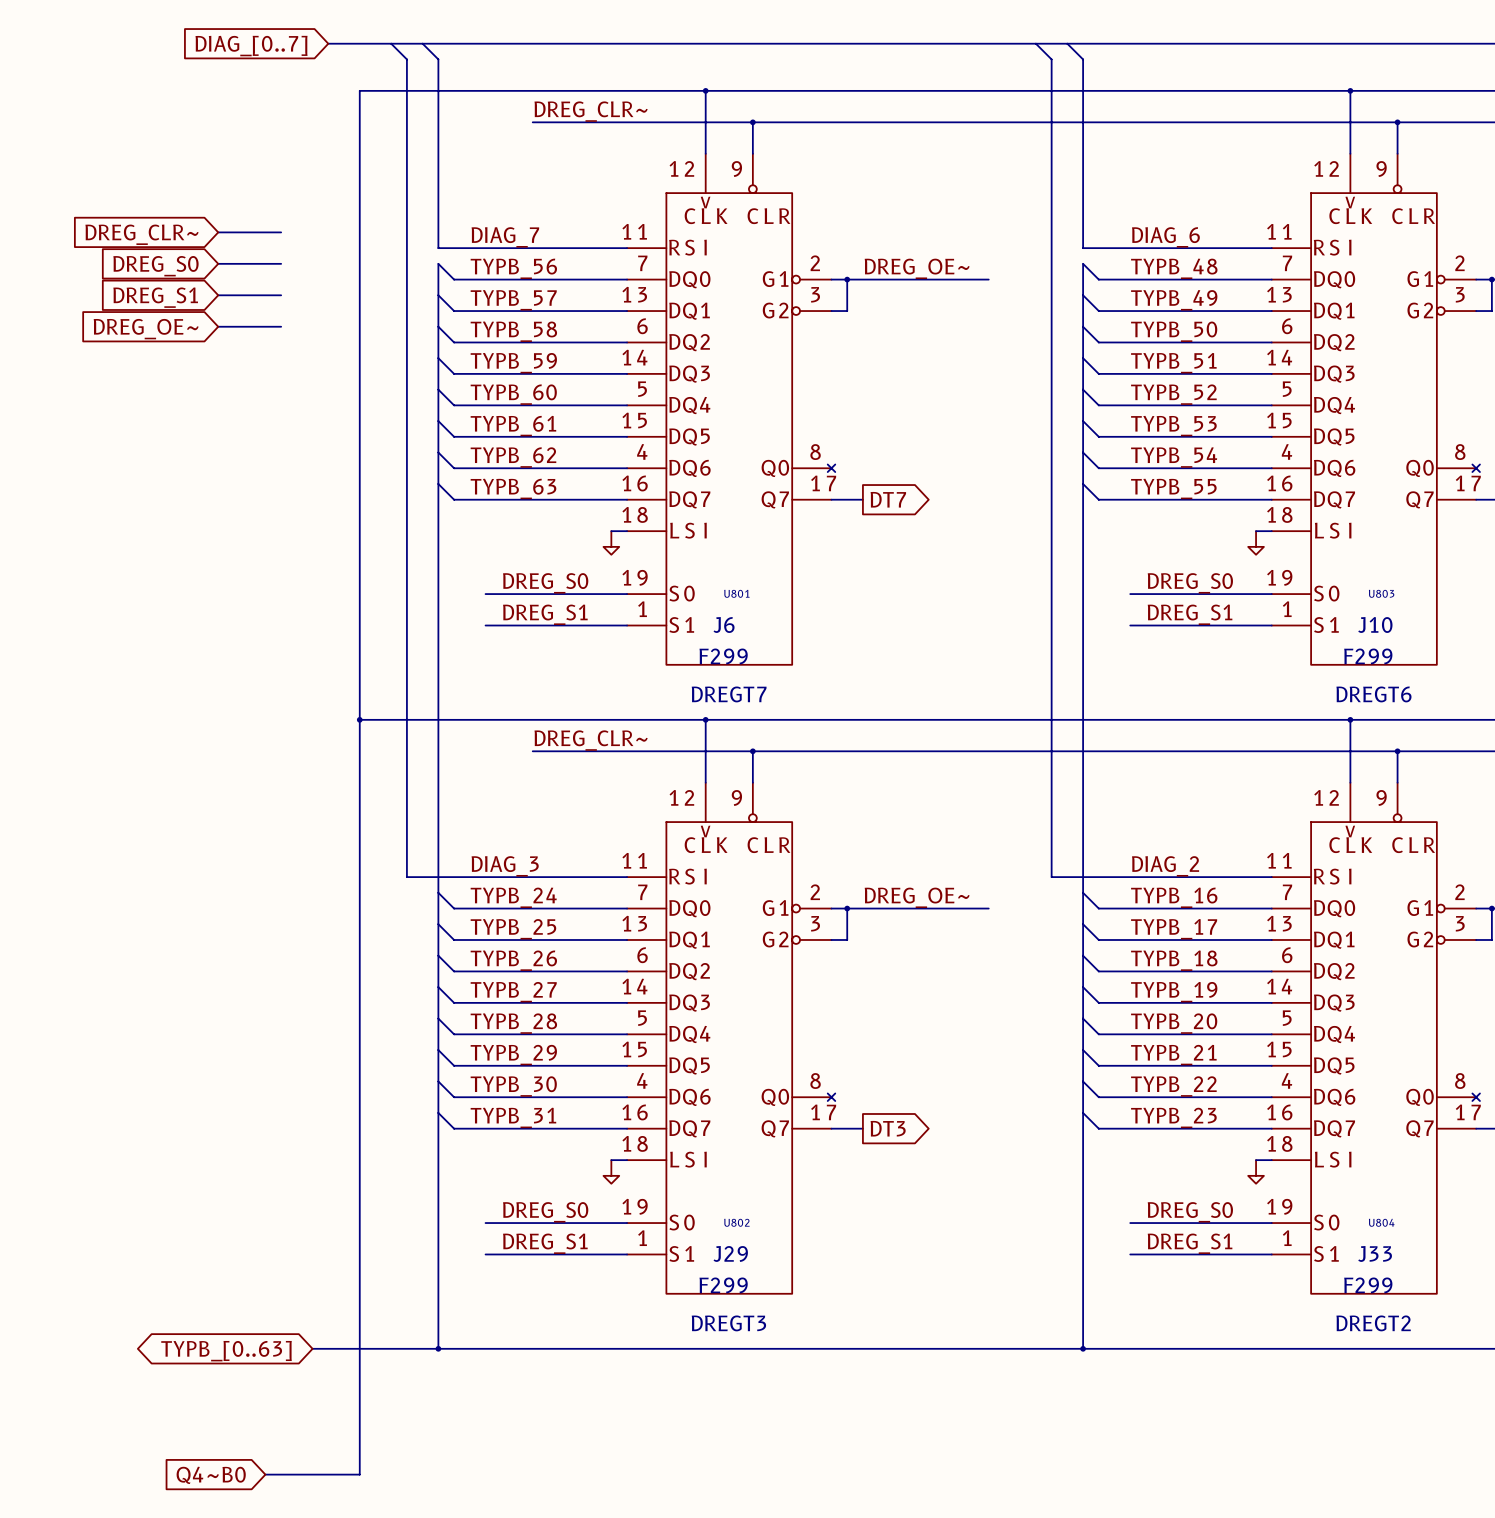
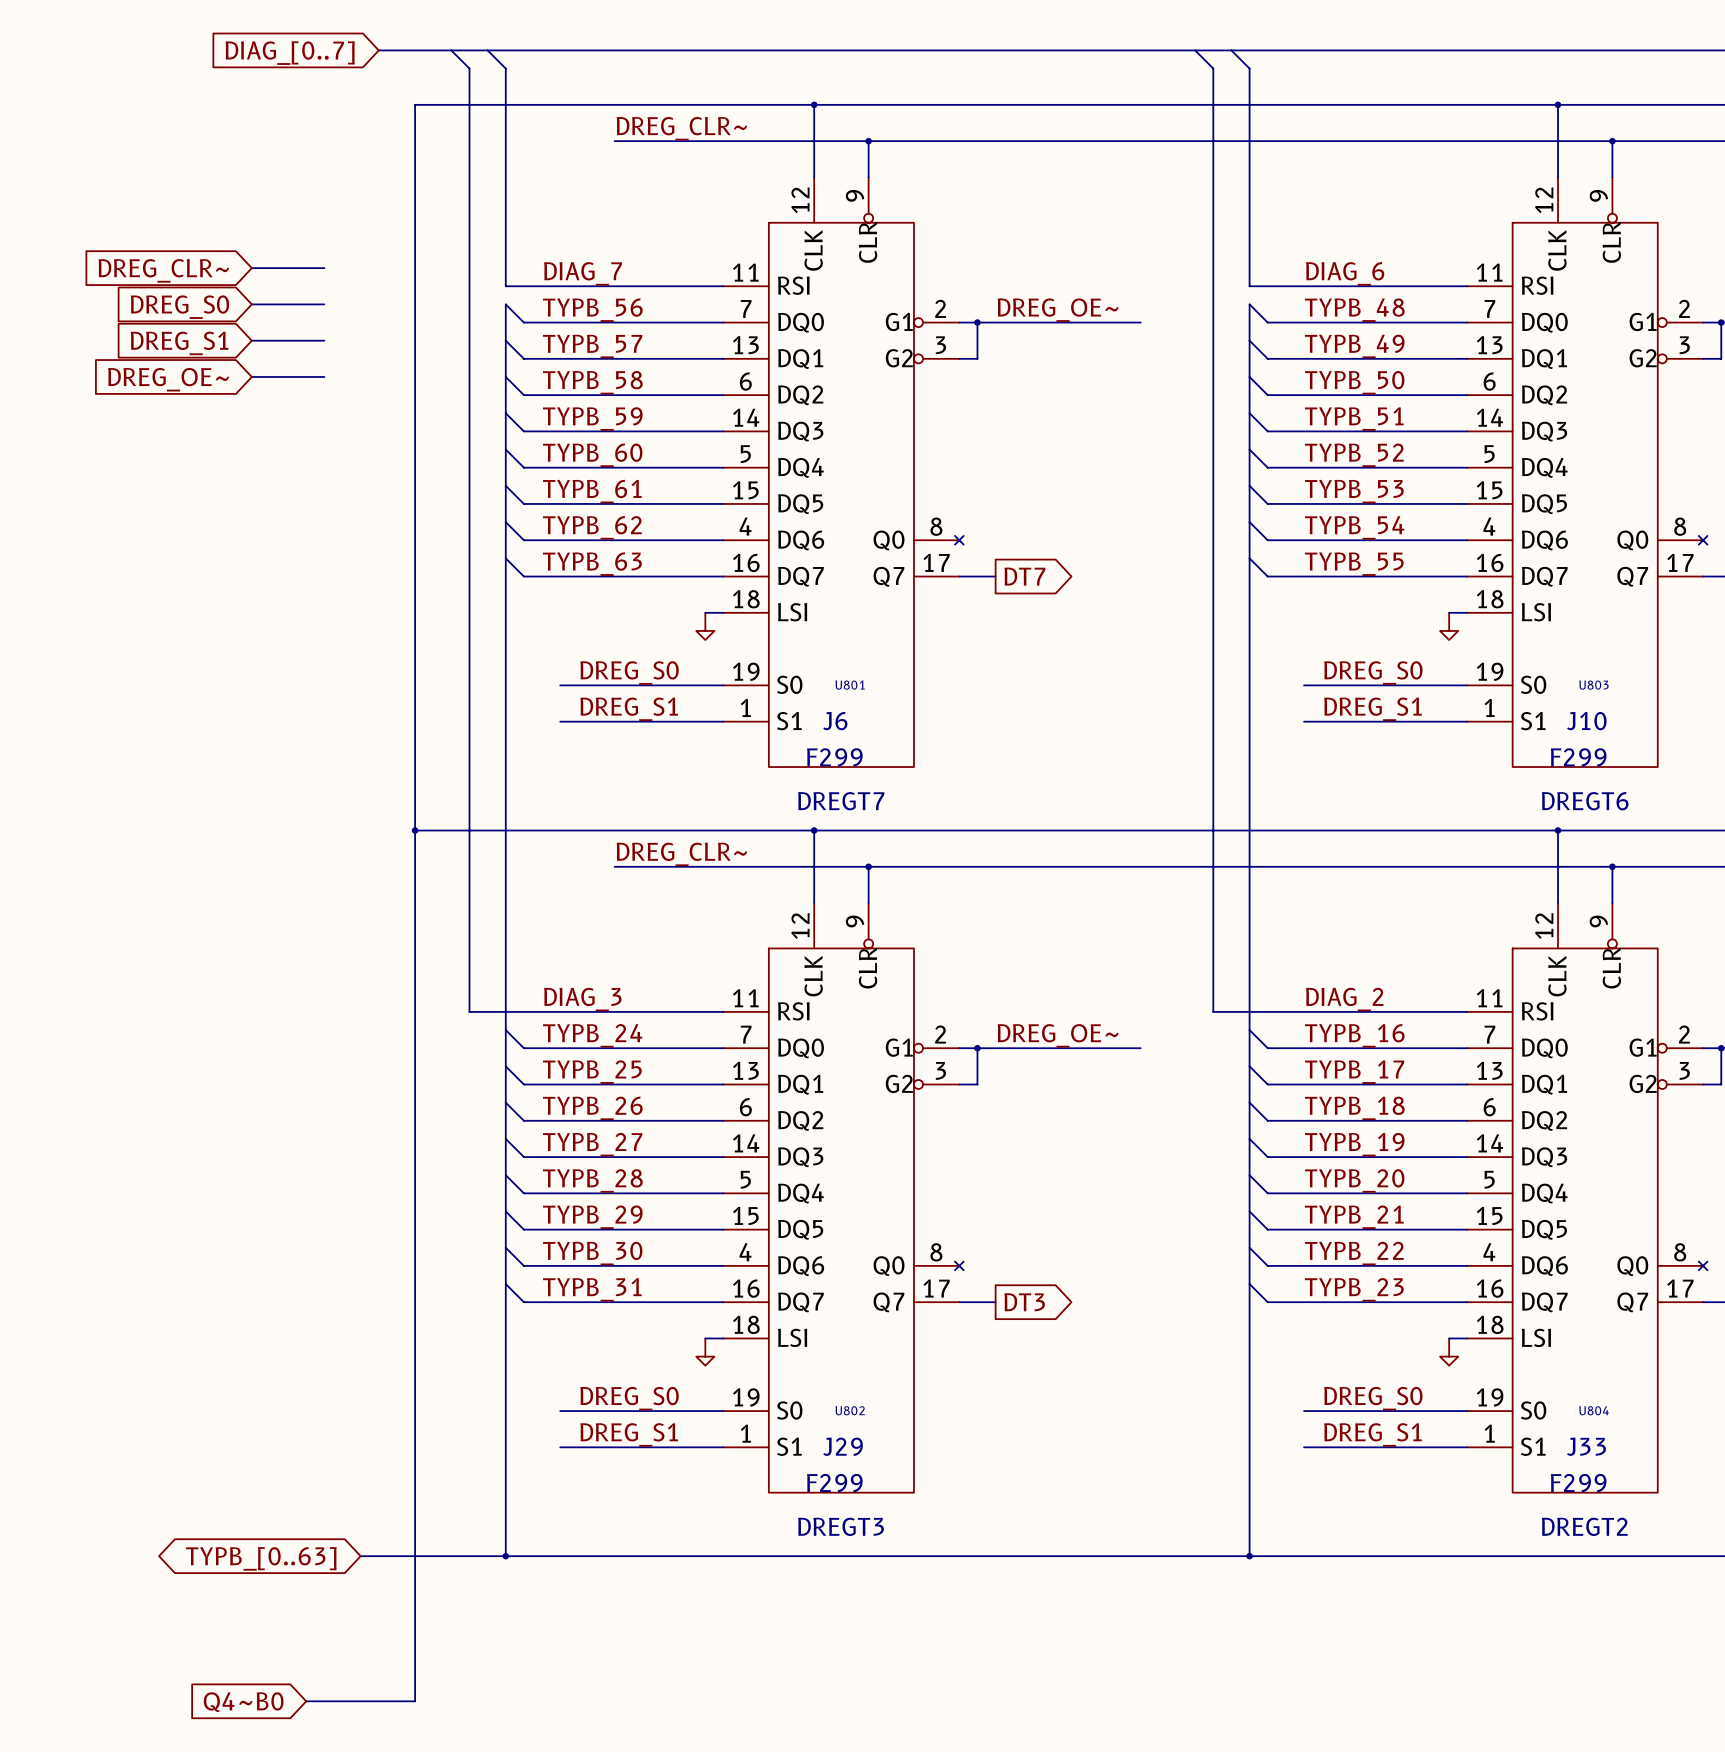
U801 symbol: [627, 153, 832, 665] -> [723, 177, 960, 768]
U803 symbol: [1271, 153, 1477, 665] -> [1467, 177, 1704, 768]
U802 symbol: [627, 782, 832, 1294] -> [723, 903, 960, 1493]
U804 symbol: [1271, 782, 1477, 1294] -> [1467, 903, 1704, 1493]

